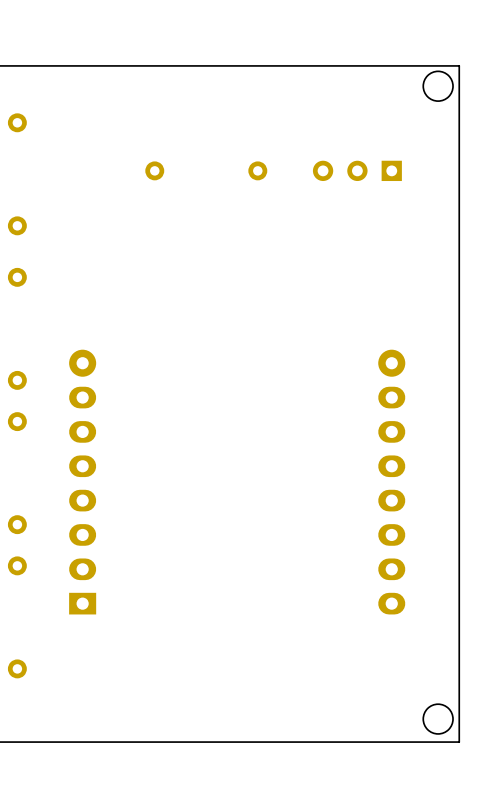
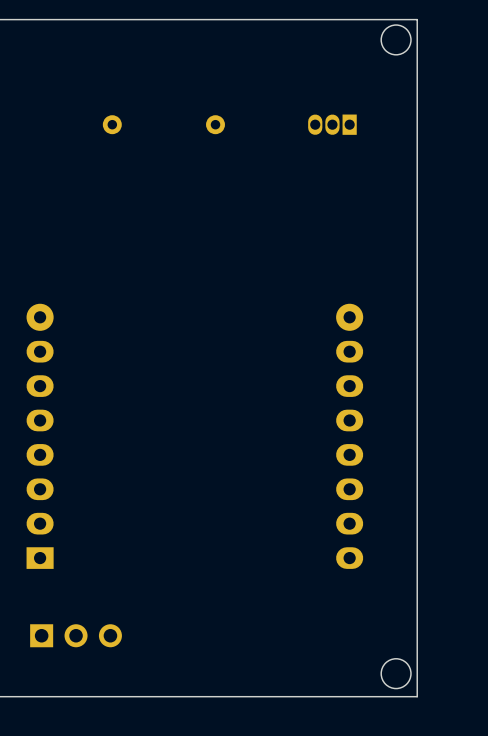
part: (357, 170) -> none
part: none -> (332, 124)
part: none -> (76, 635)

